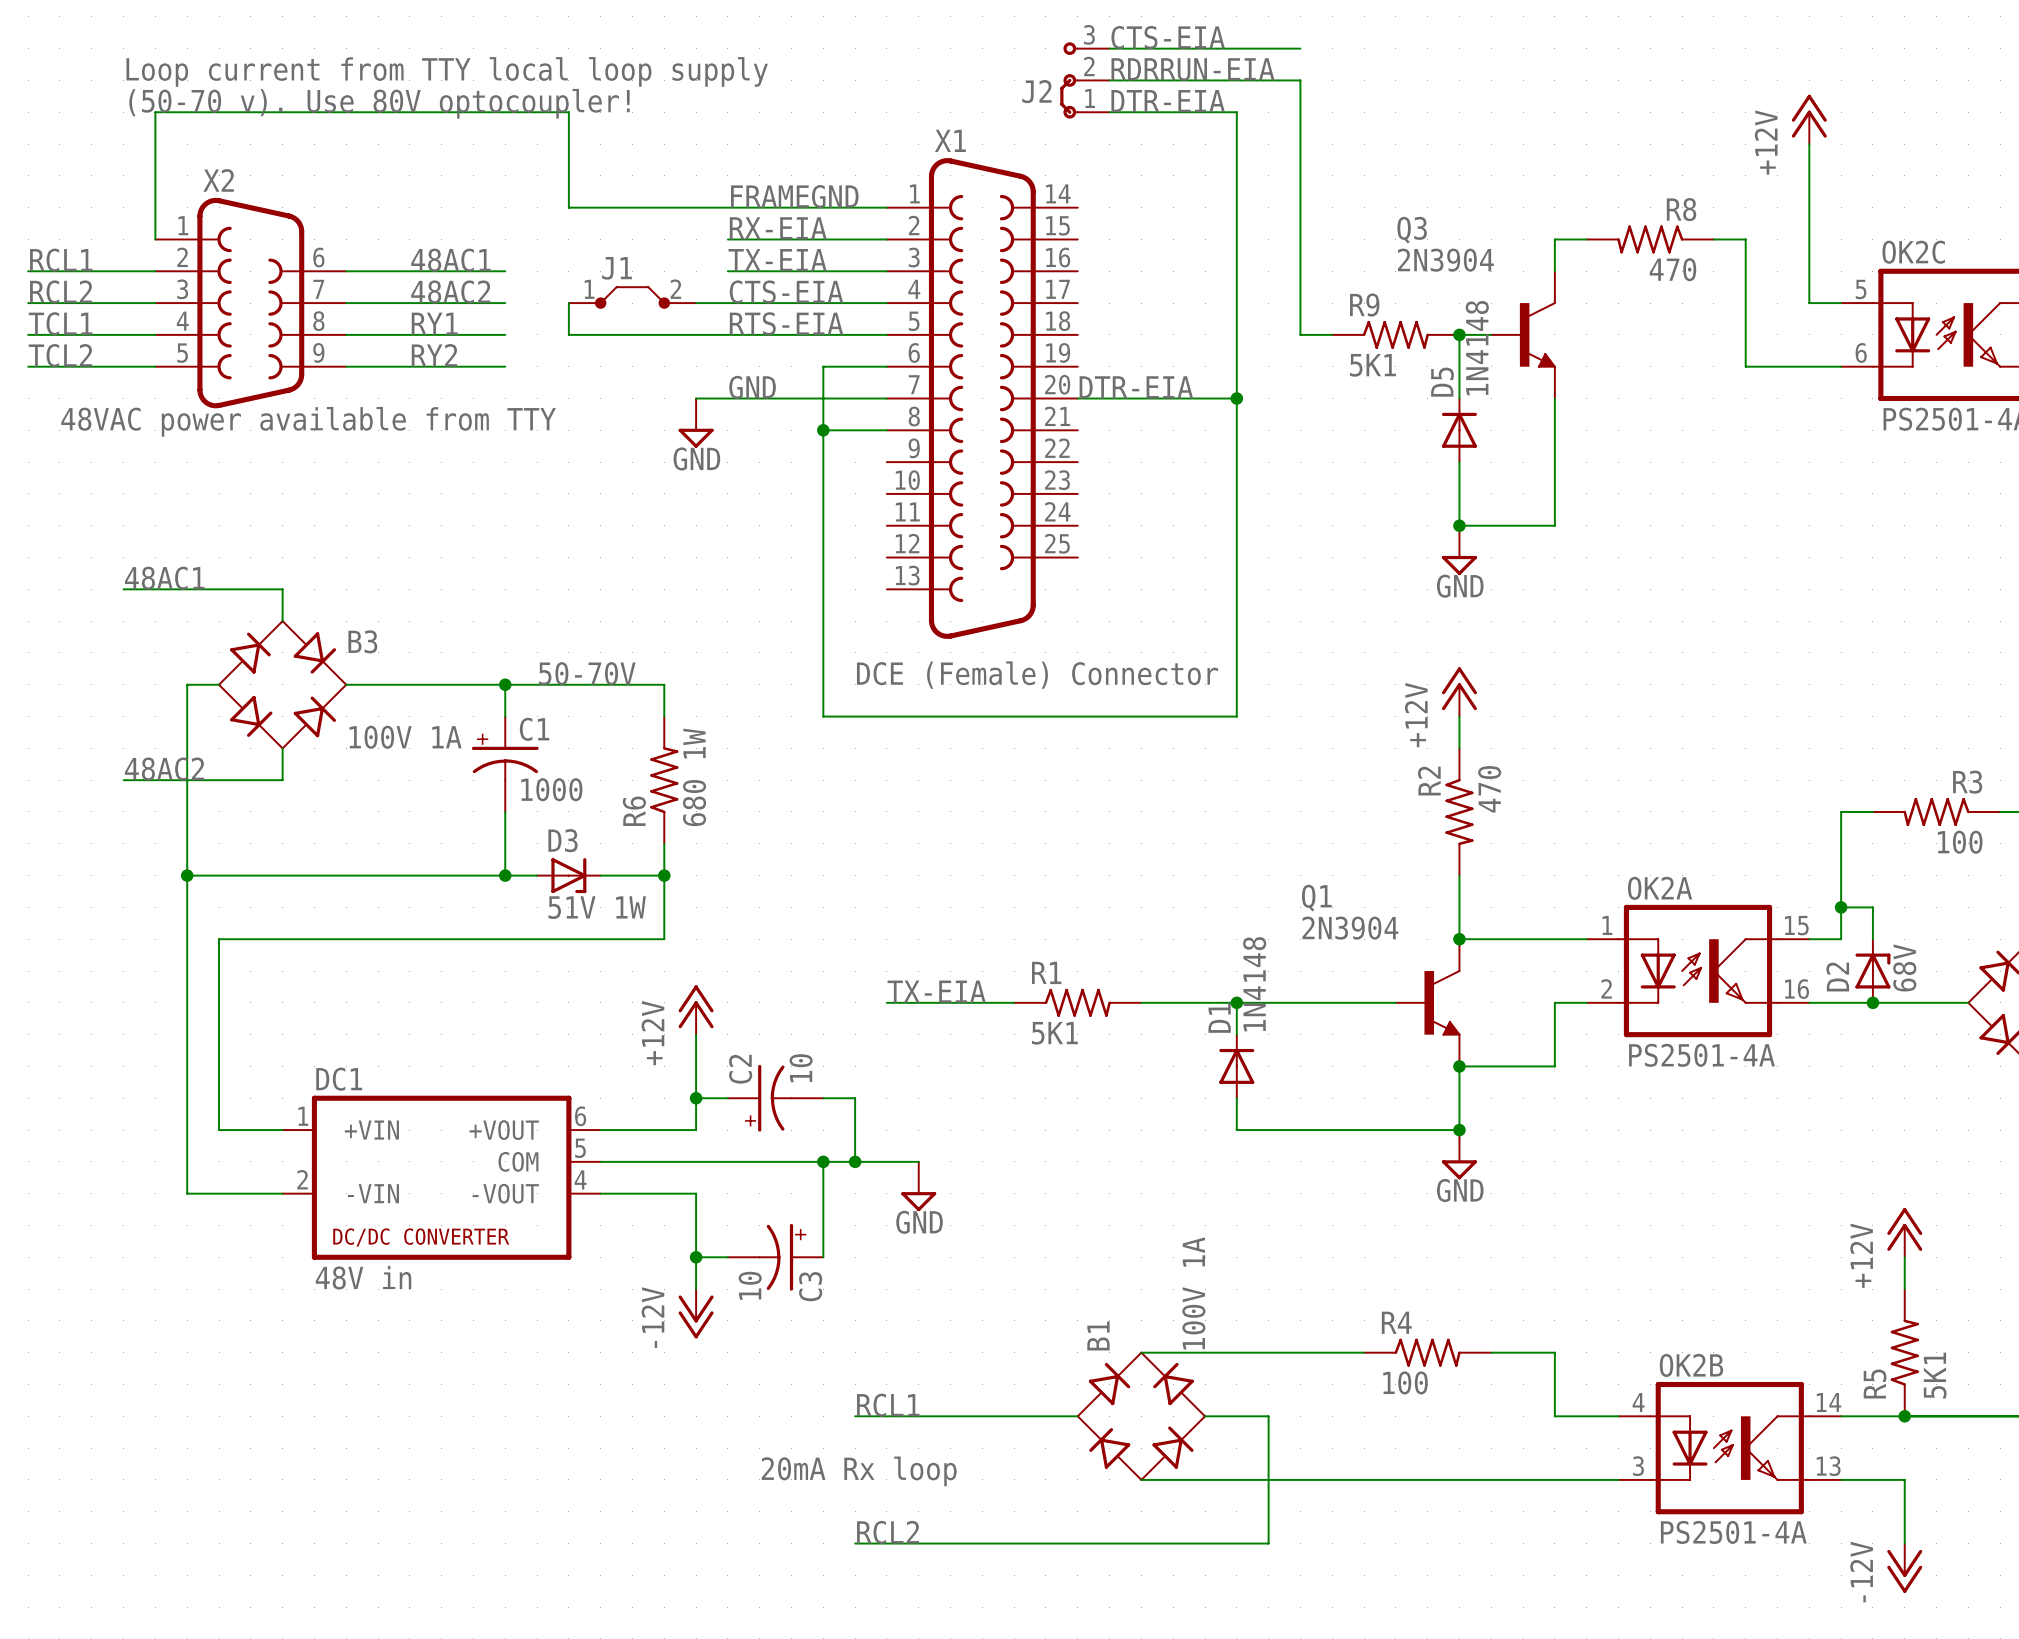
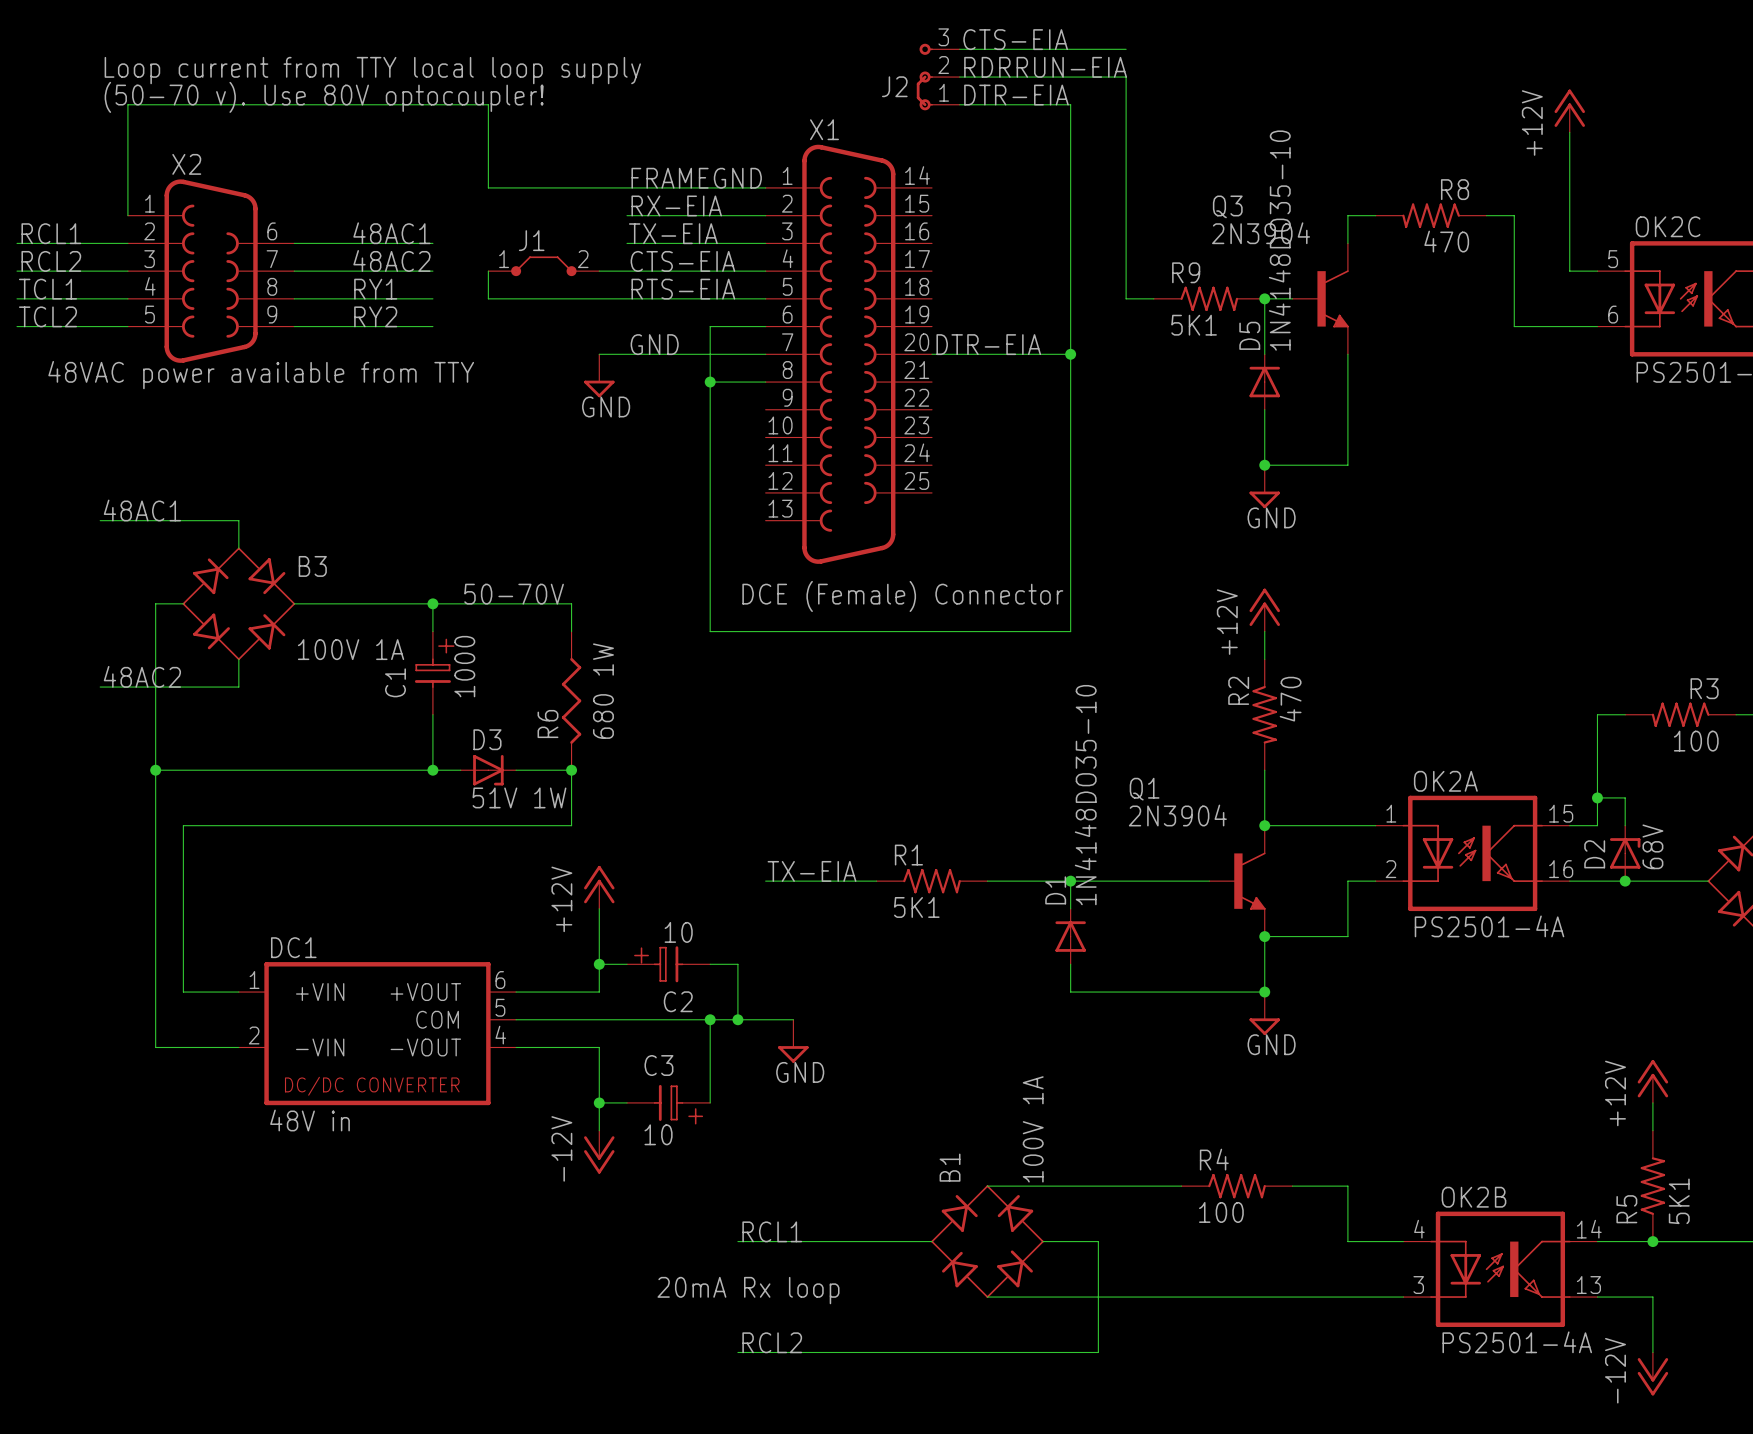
D5 value: 1N4148 (1477, 348) -> 1N4148DO35-10 (1279, 240)
C1 symbol: [471, 716, 539, 812] -> [414, 631, 451, 715]
R6 symbol: [650, 716, 679, 844] -> [561, 631, 582, 771]
C1 name position: C1 (534, 729) -> C1 (395, 682)
C1 value position: 1000 (551, 789) -> 1000 (464, 666)
D1 value: 1N4148 (1254, 984) -> 1N4148DO35-10 (1085, 795)
C2 symbol: [727, 1064, 824, 1132] -> [627, 946, 711, 983]
C2 name position: C2 (740, 1069) -> C2 (678, 1001)
C3 symbol: [727, 1223, 824, 1291] -> [627, 1084, 711, 1121]
C3 name position: C3 (810, 1286) -> C3 (658, 1065)

